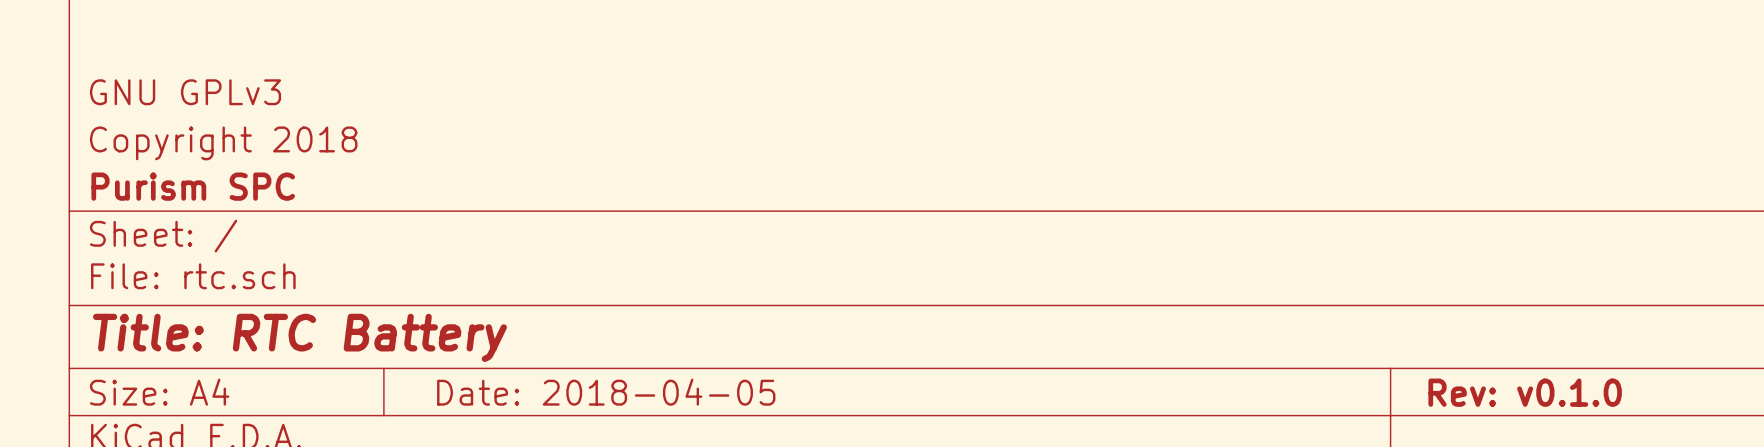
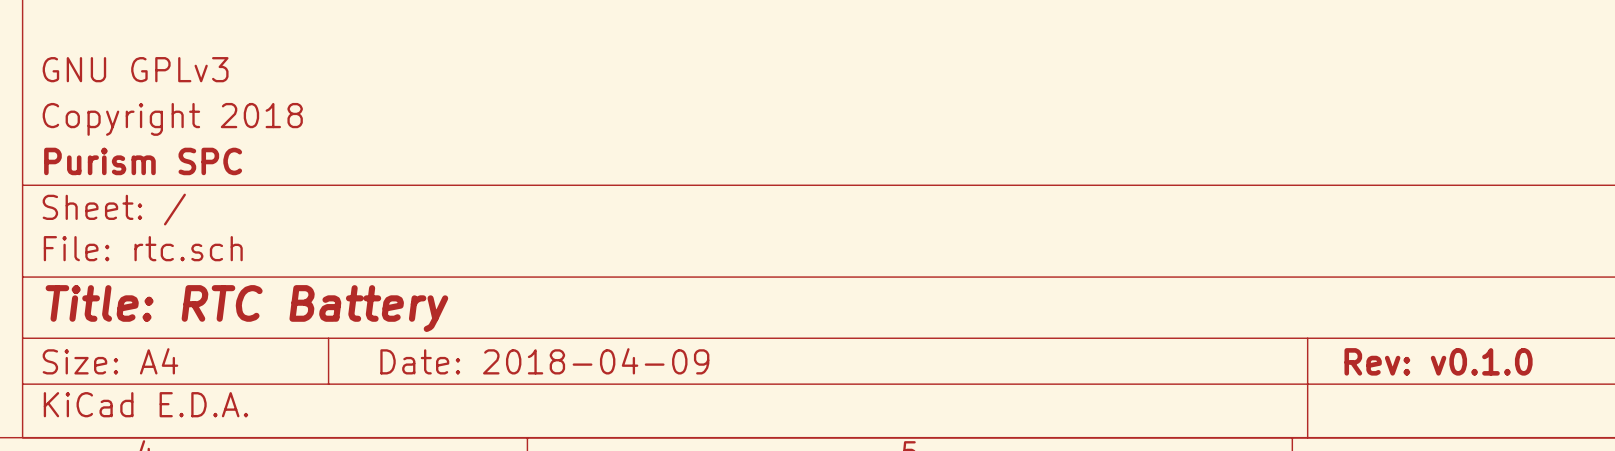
title block: Date: 2018-04-05 (606, 392) -> Date: 2018-04-09 (544, 361)

